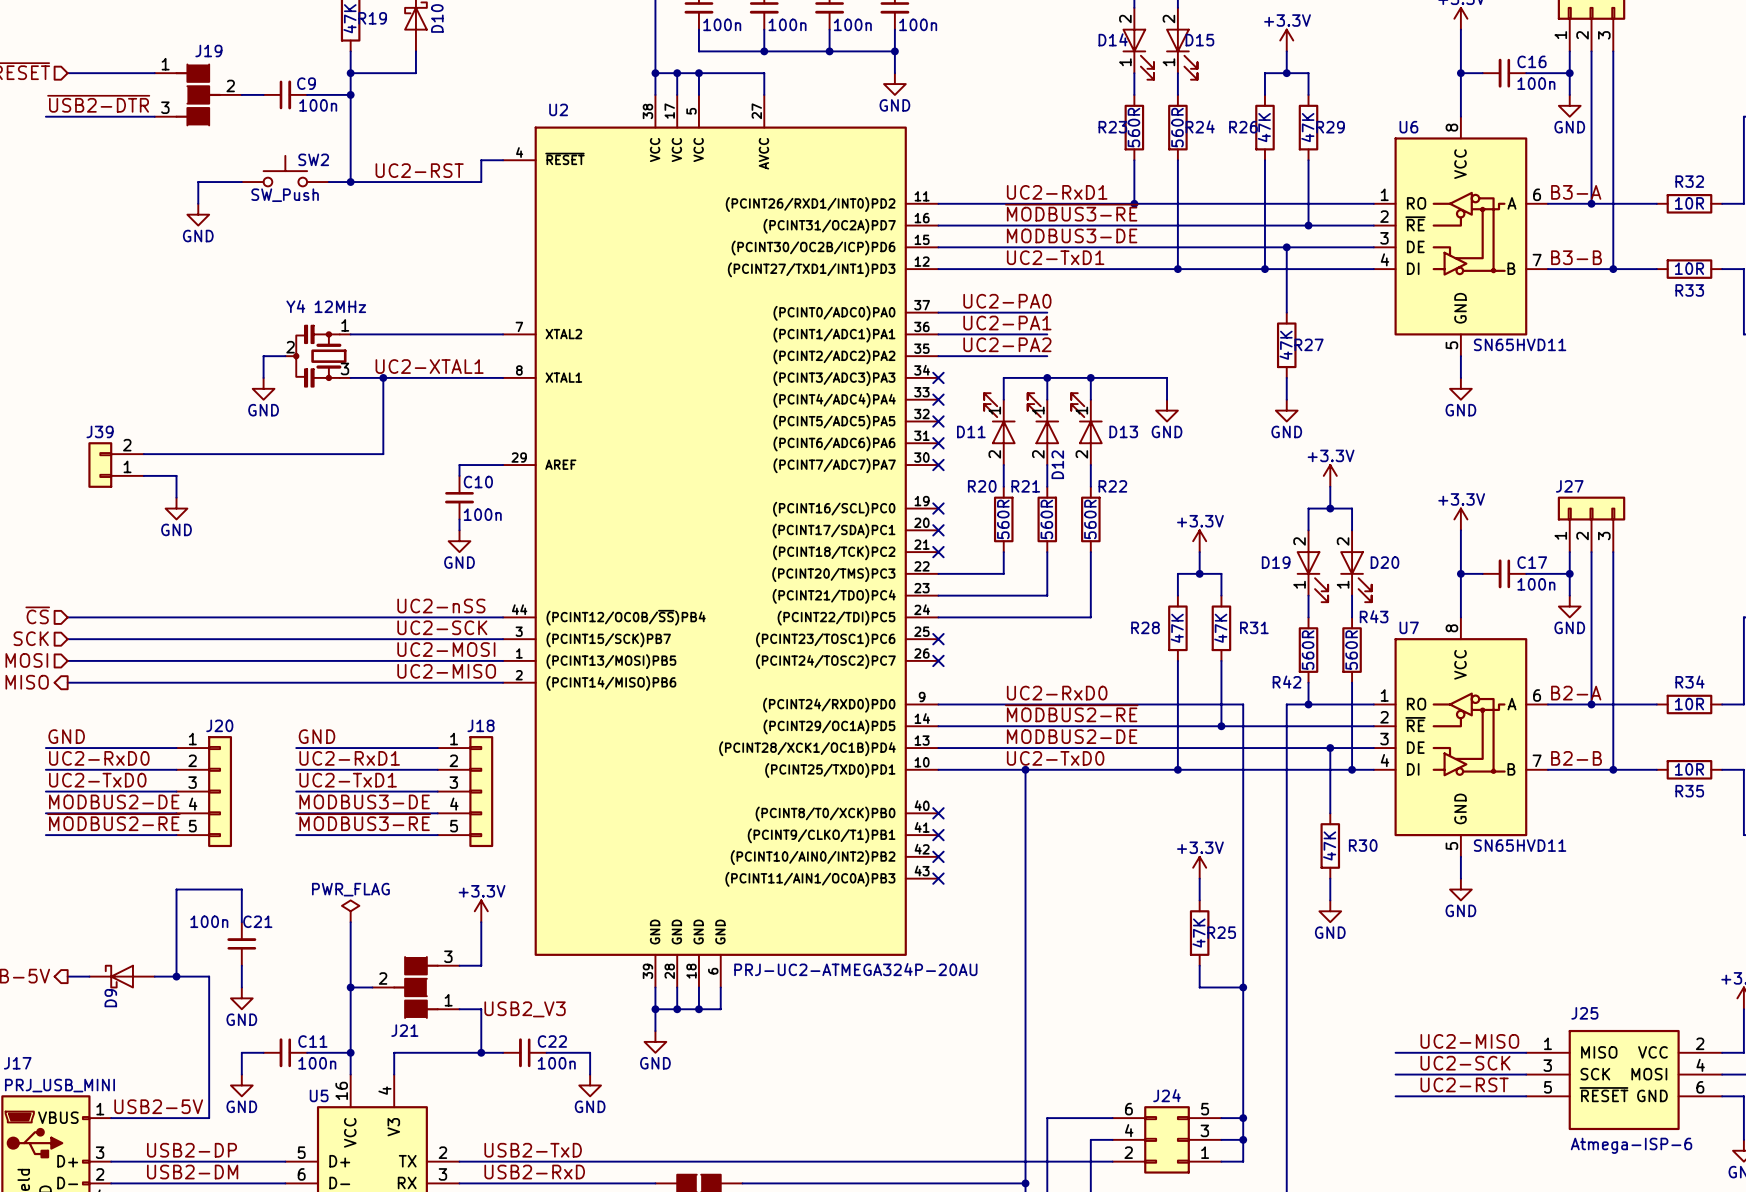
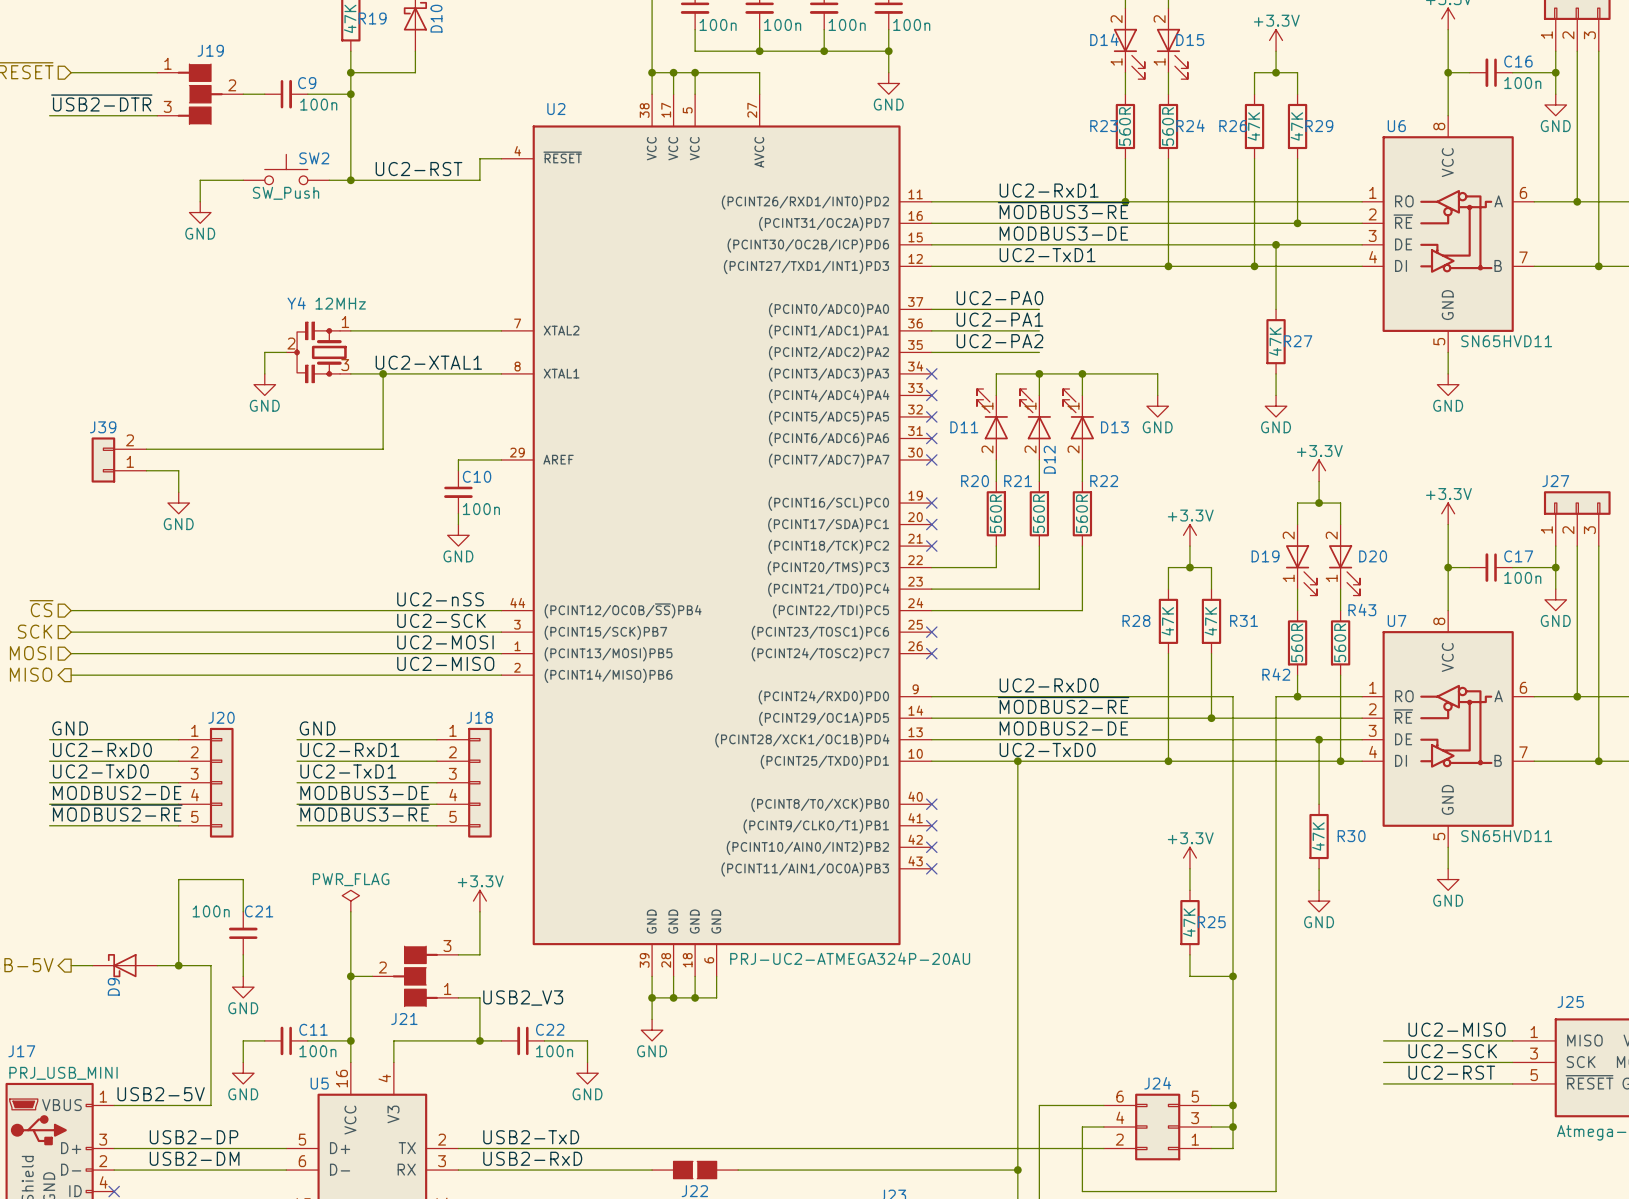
label: B3-A (1576, 192) -> none
label: B3-B (1576, 257) -> none
label: B2-A (1576, 693) -> none
label: B2-B (1576, 758) -> none

